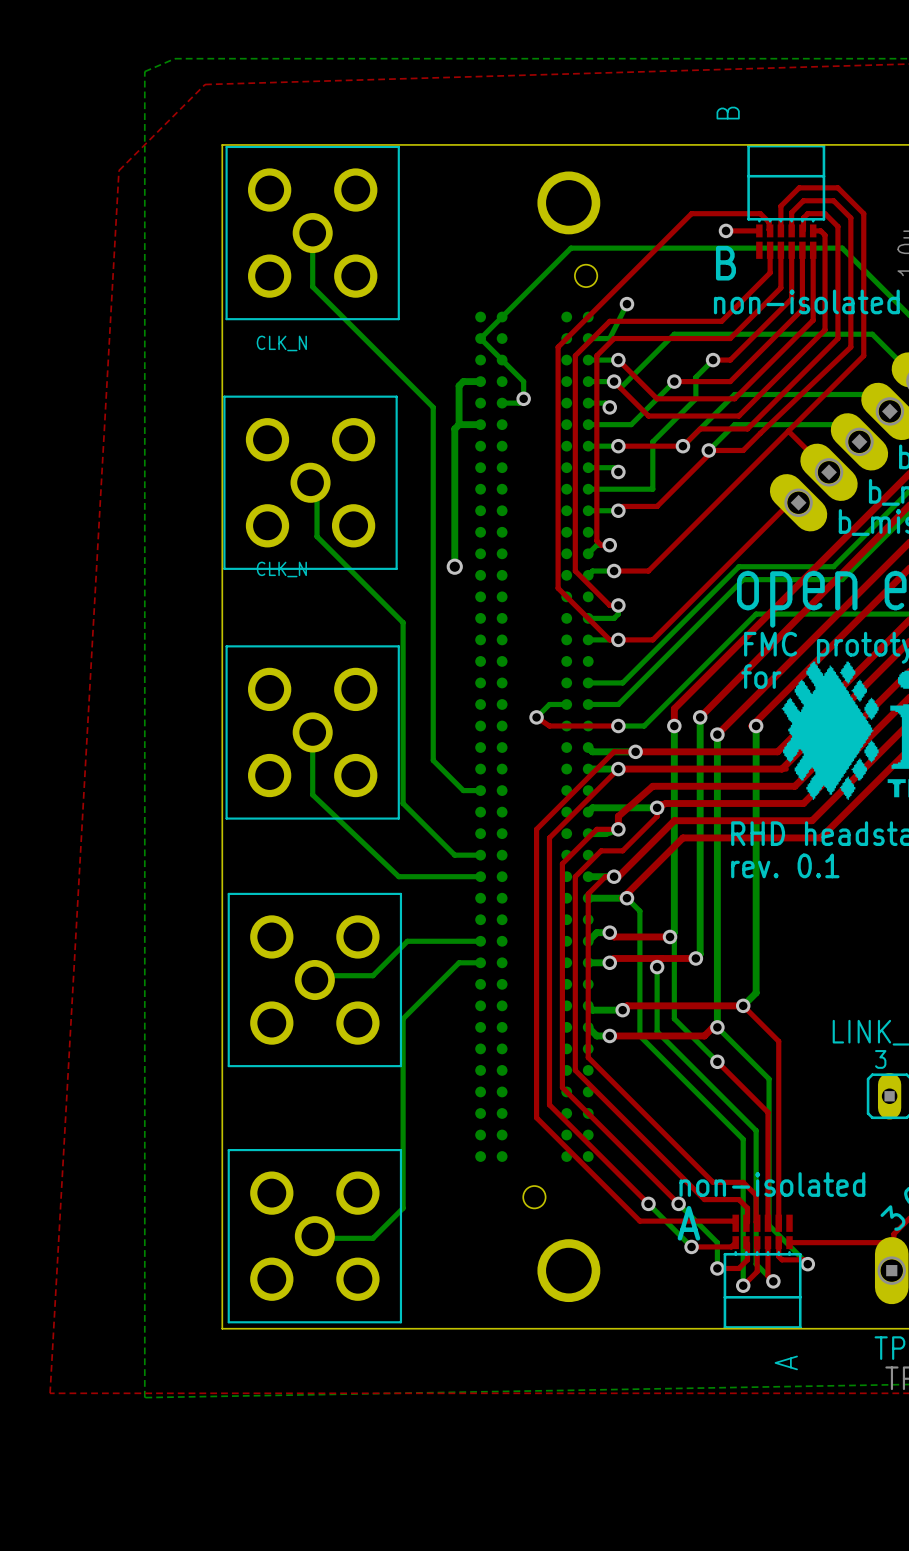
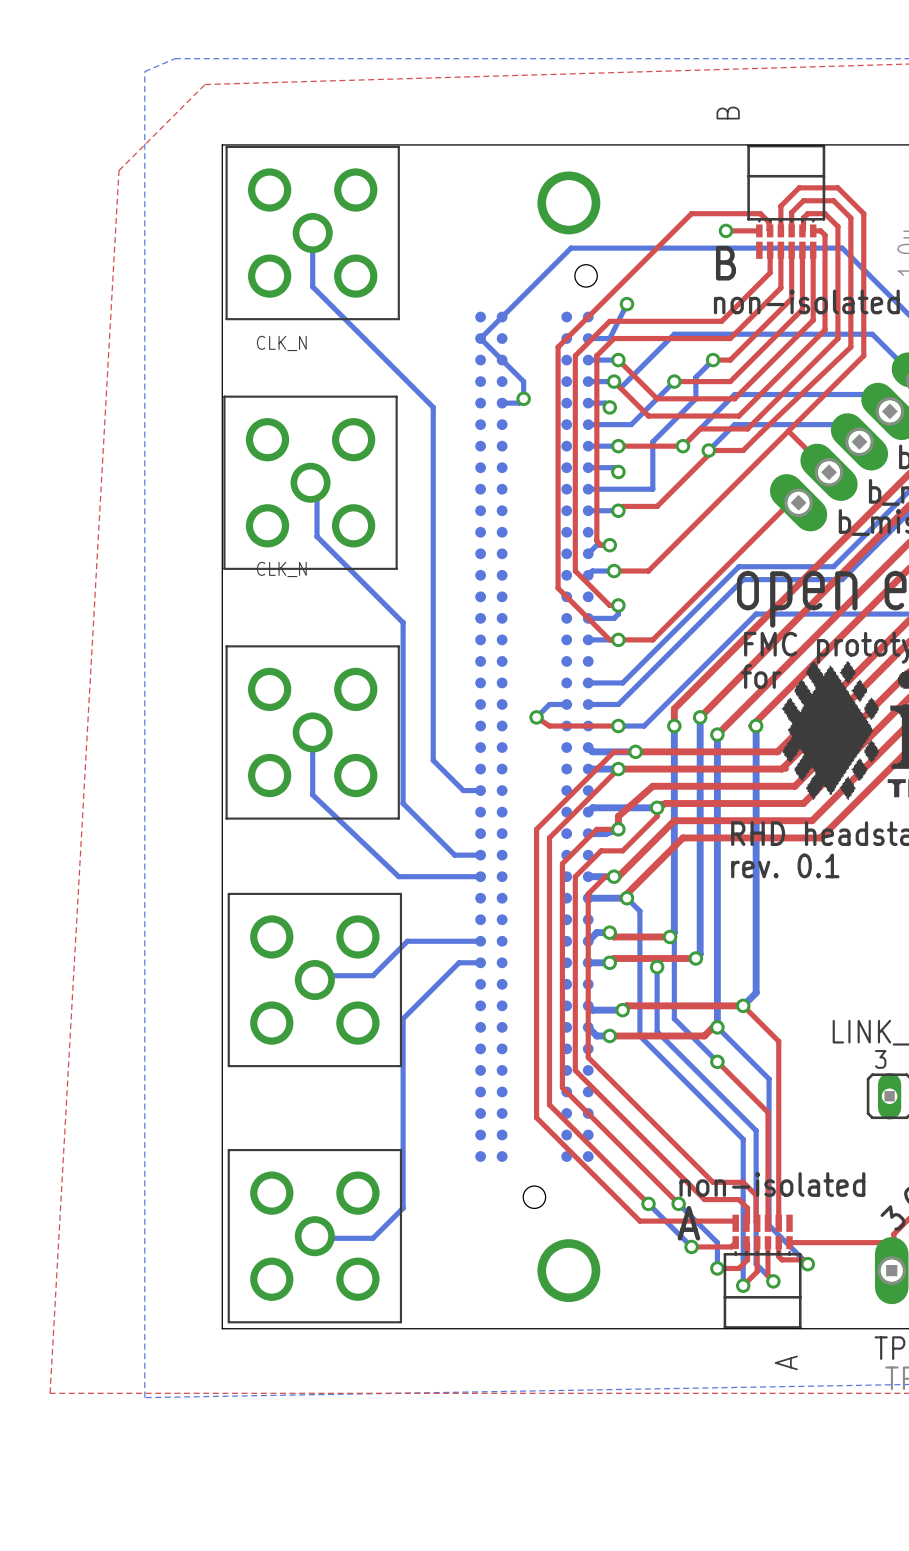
bottom track: (480, 381) (463, 381) (459, 385) (459, 424) -> none
bottom track: (459, 424) (454, 428) (454, 566) -> none
bottom track: (459, 424) (480, 424) -> none
via: (454, 566) -> none

